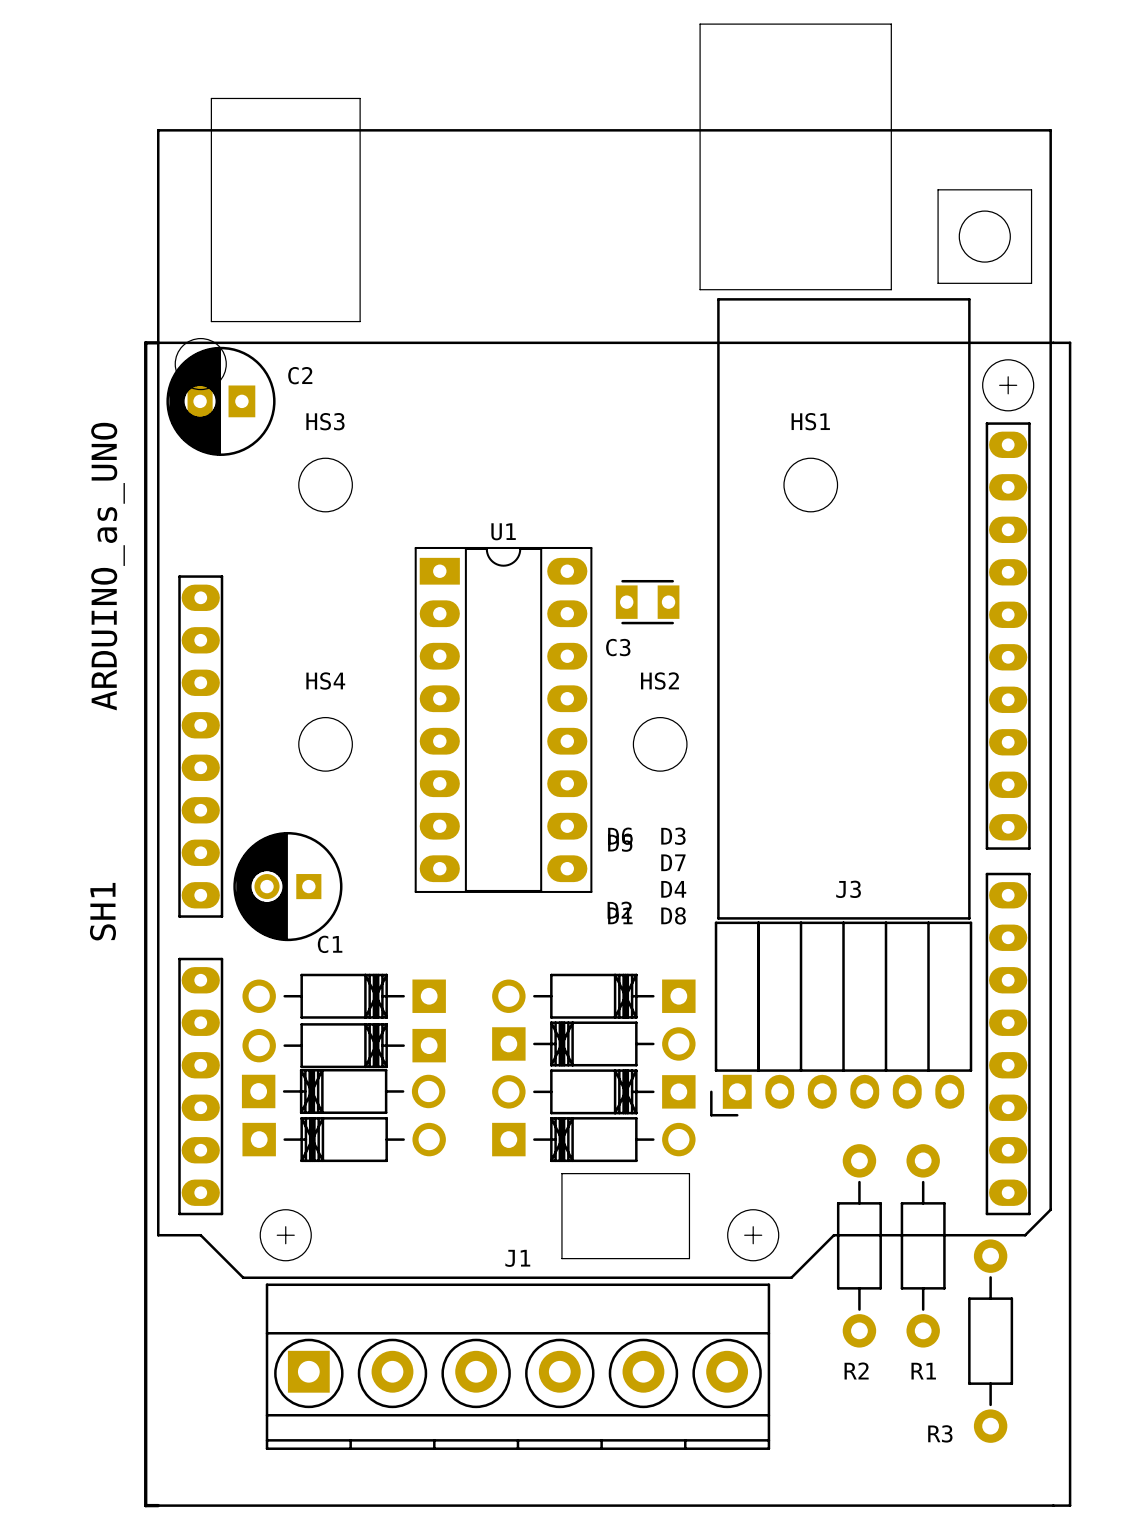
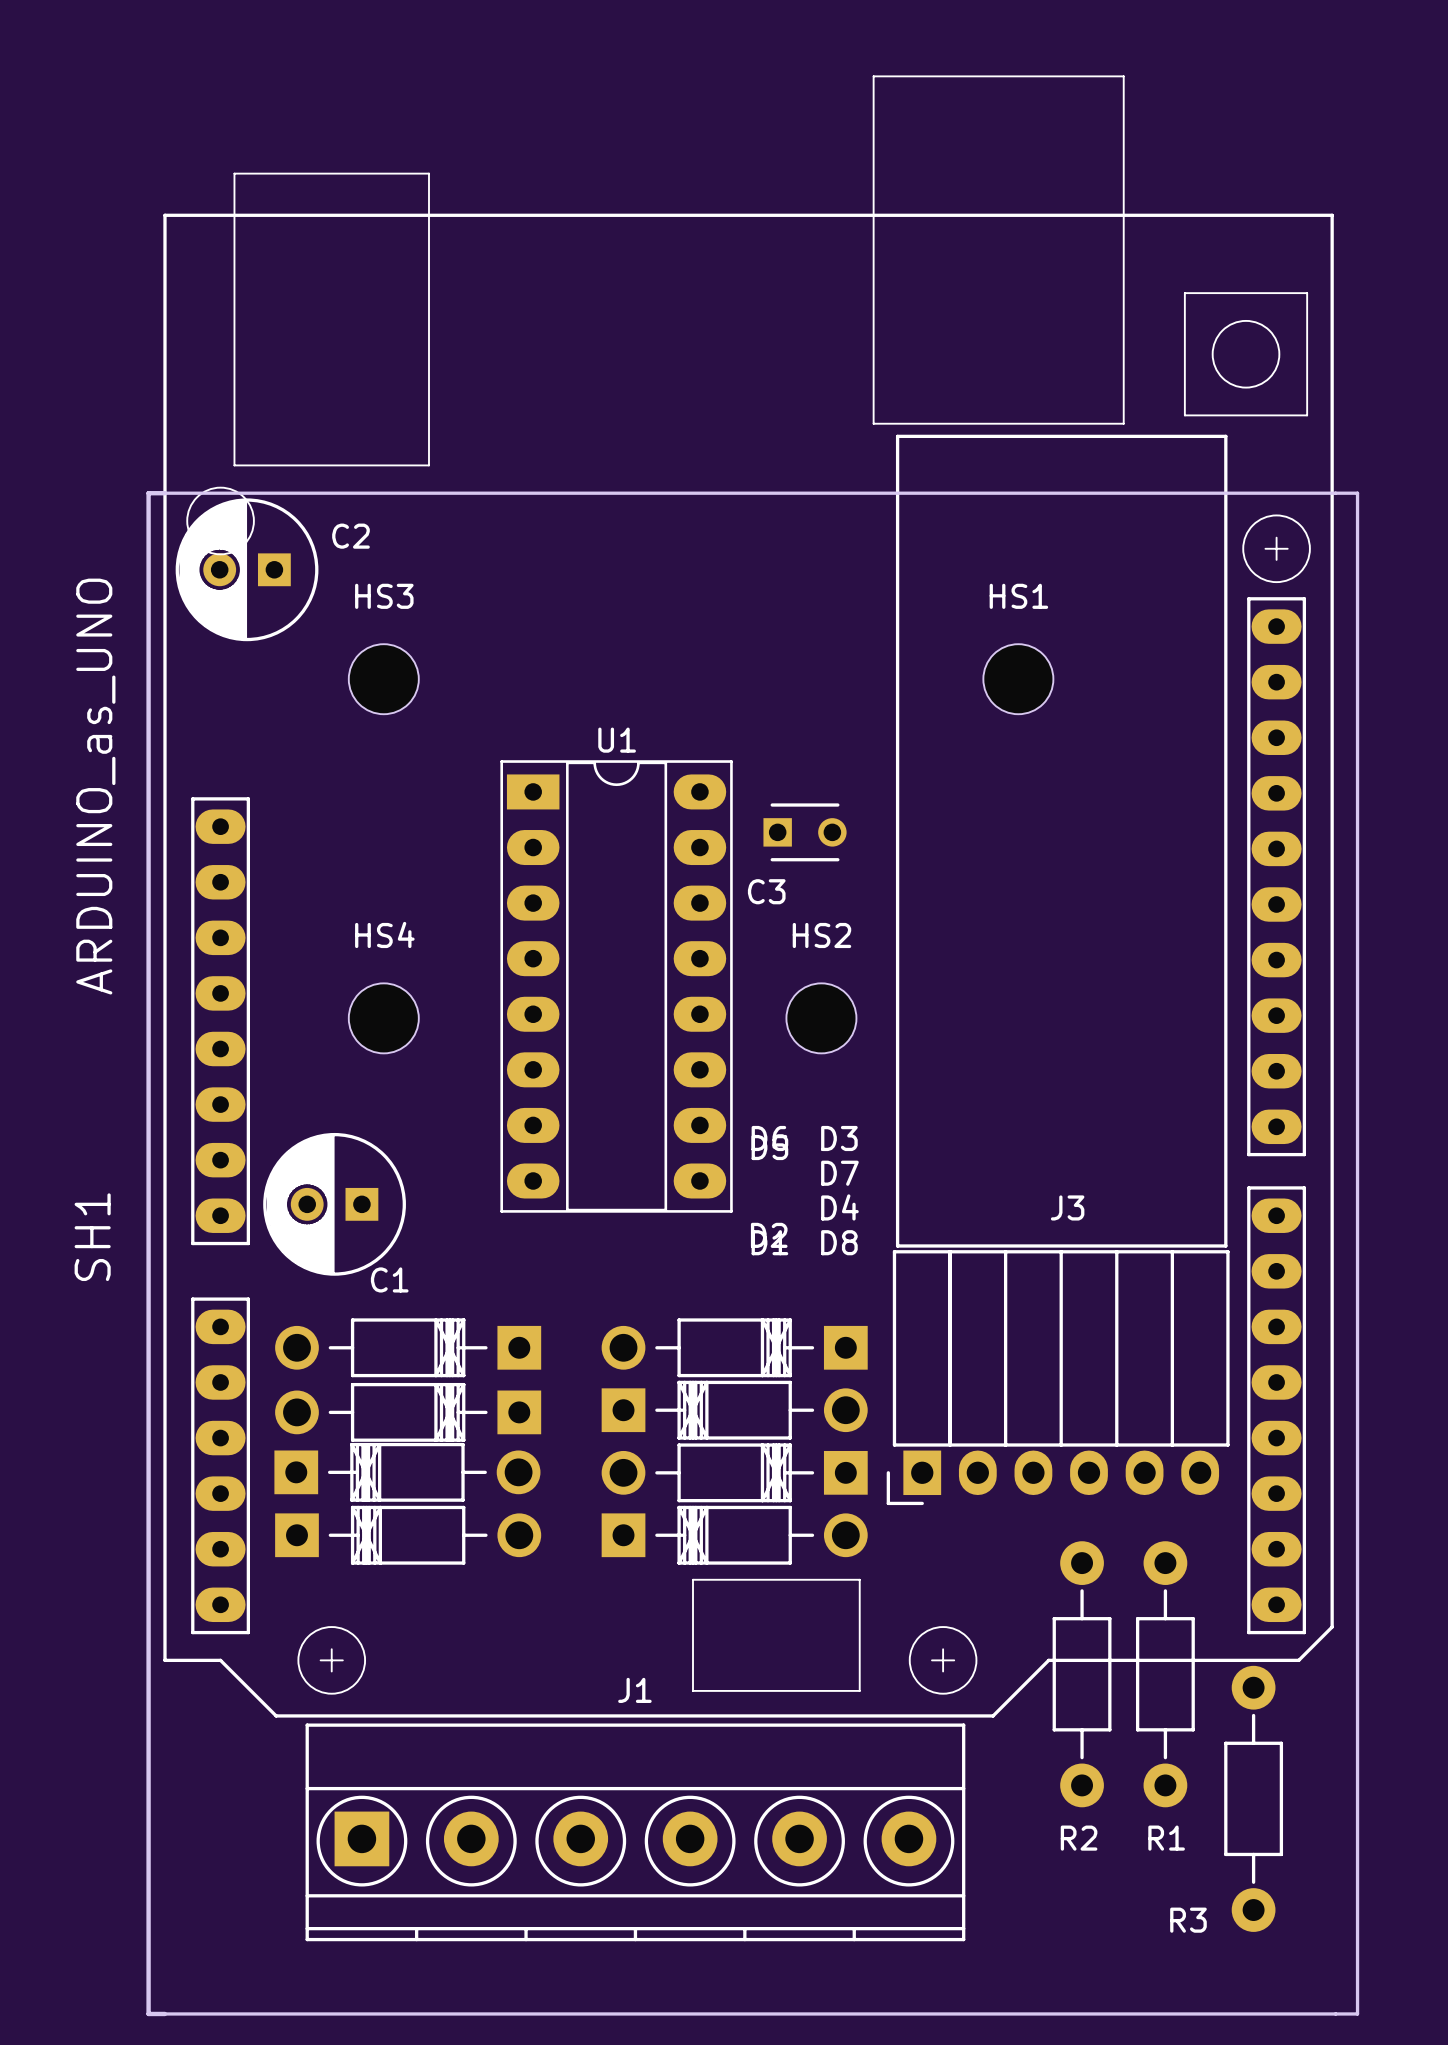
C2 footprint: [166, 346, 276, 456] -> [175, 498, 319, 642]
C3 footprint: [615, 579, 680, 625] -> [763, 803, 847, 862]

